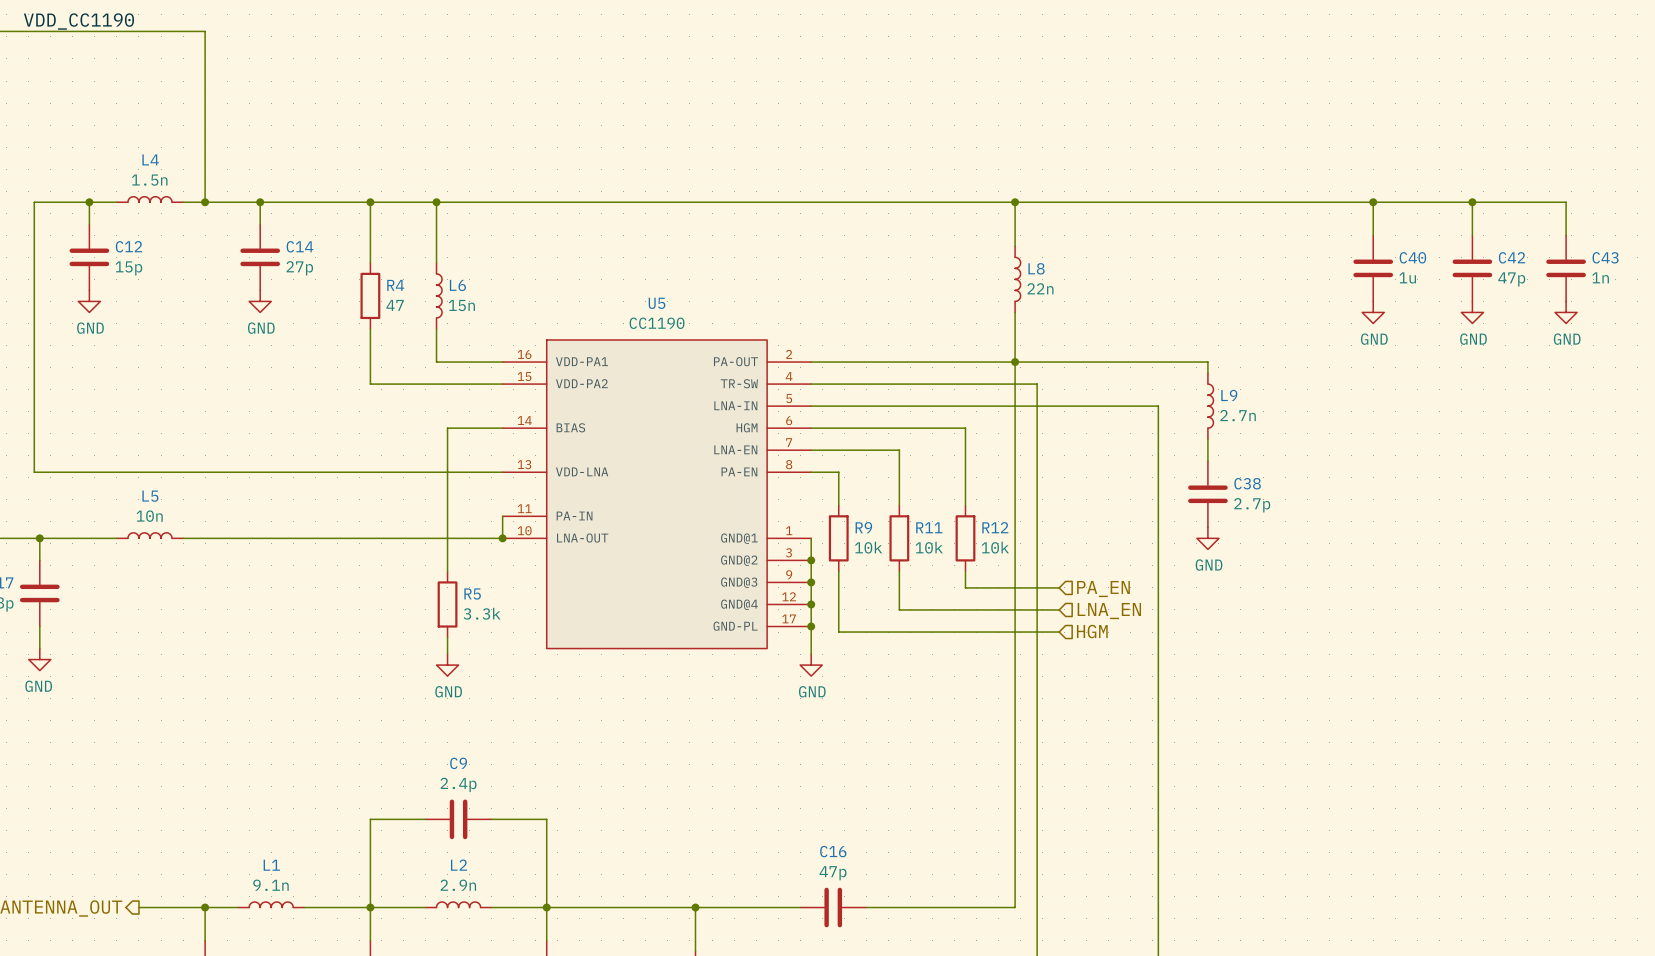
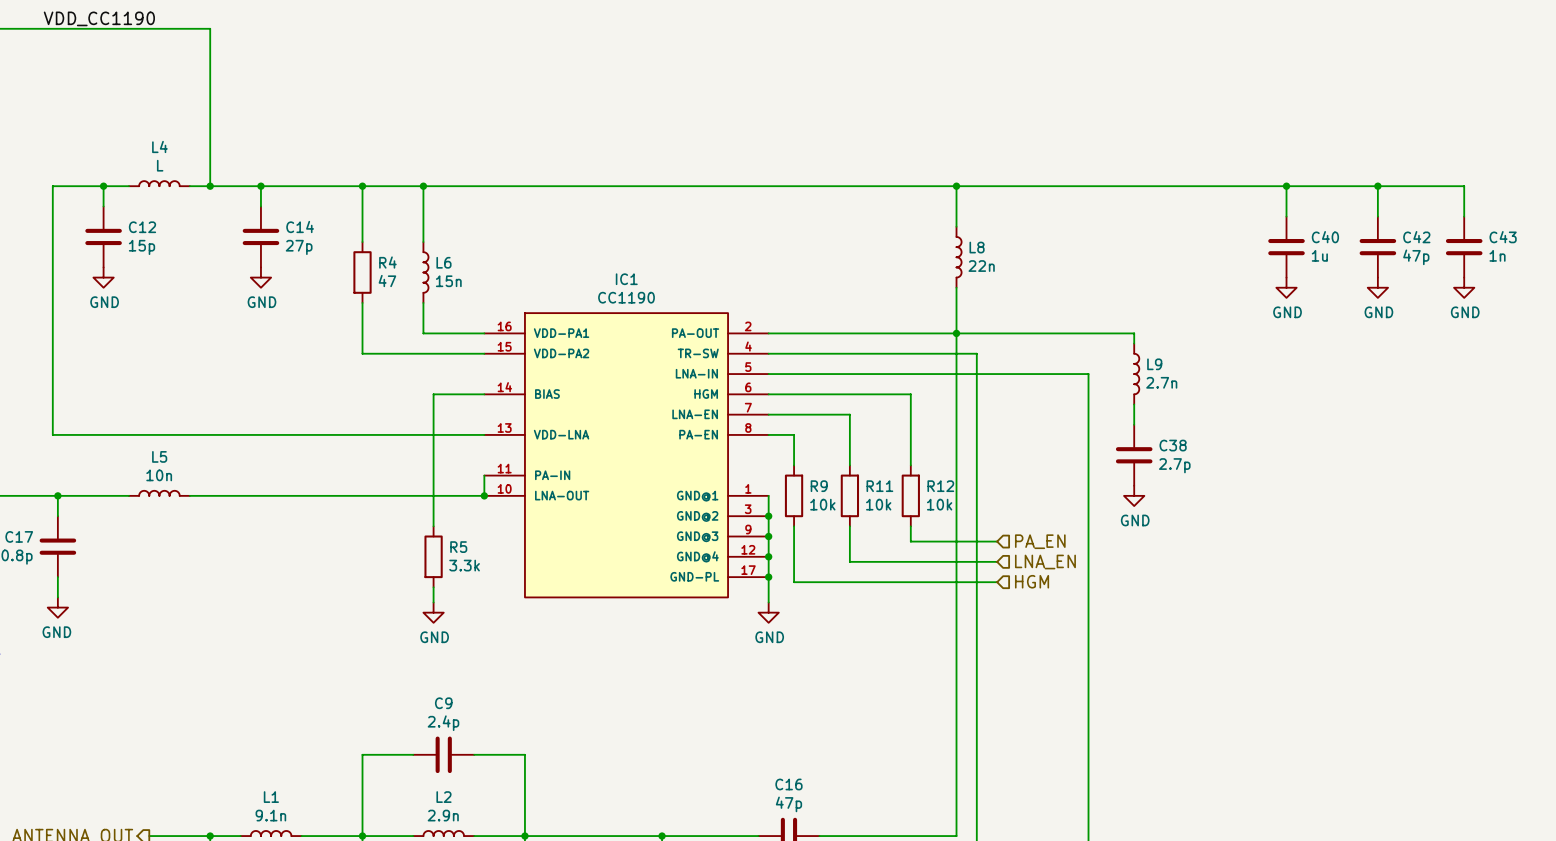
L4 value: 1.5n (149, 180) -> L (160, 165)
U5 name: U5 (657, 303) -> IC1 (626, 279)

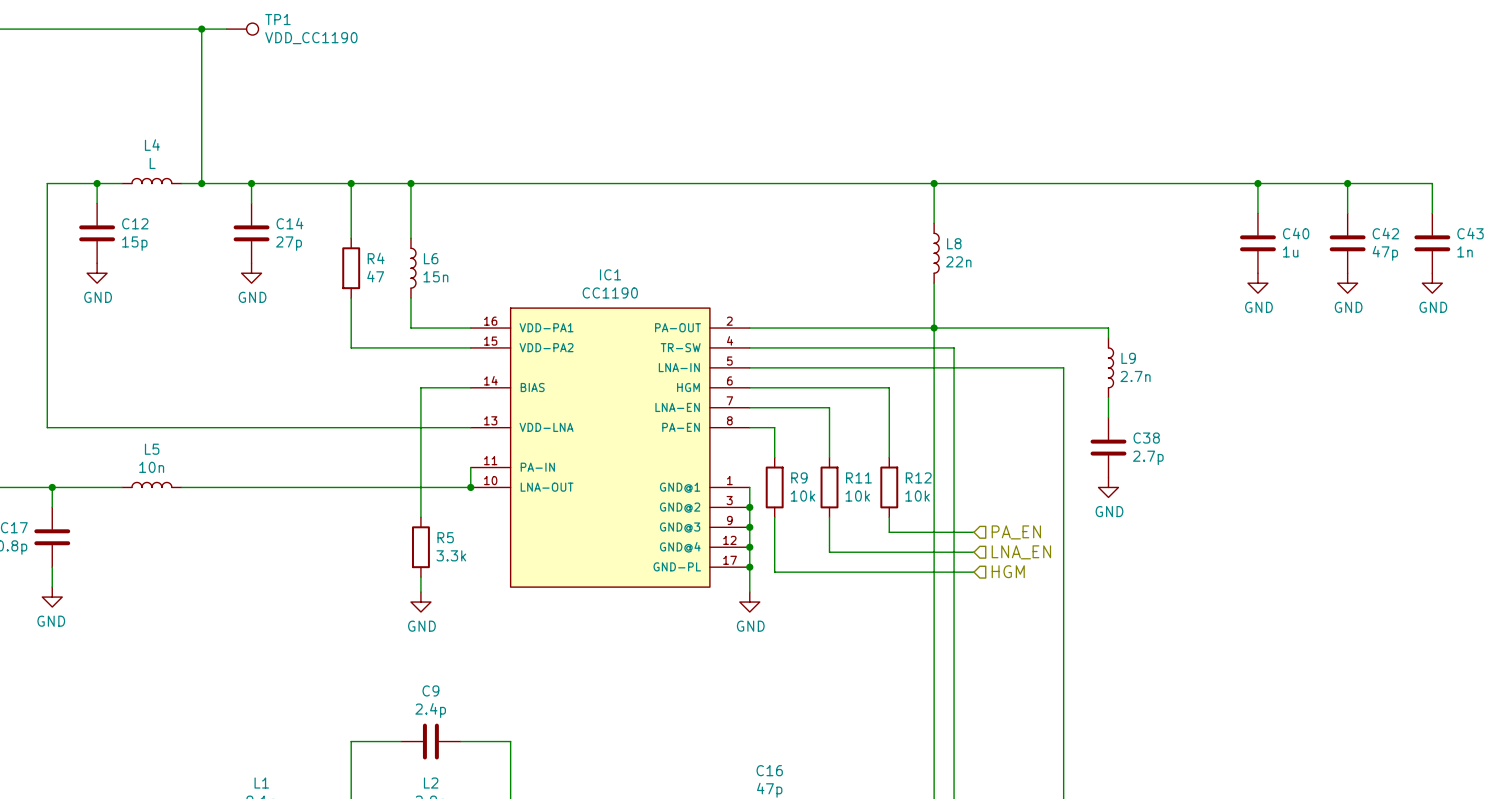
label: VDD_CC1190 (99, 18) -> none
wire: none -> (201, 29) (226, 29)
junction: none -> (201, 29)
TP1: none -> VDD_CC1190 (242, 29)

